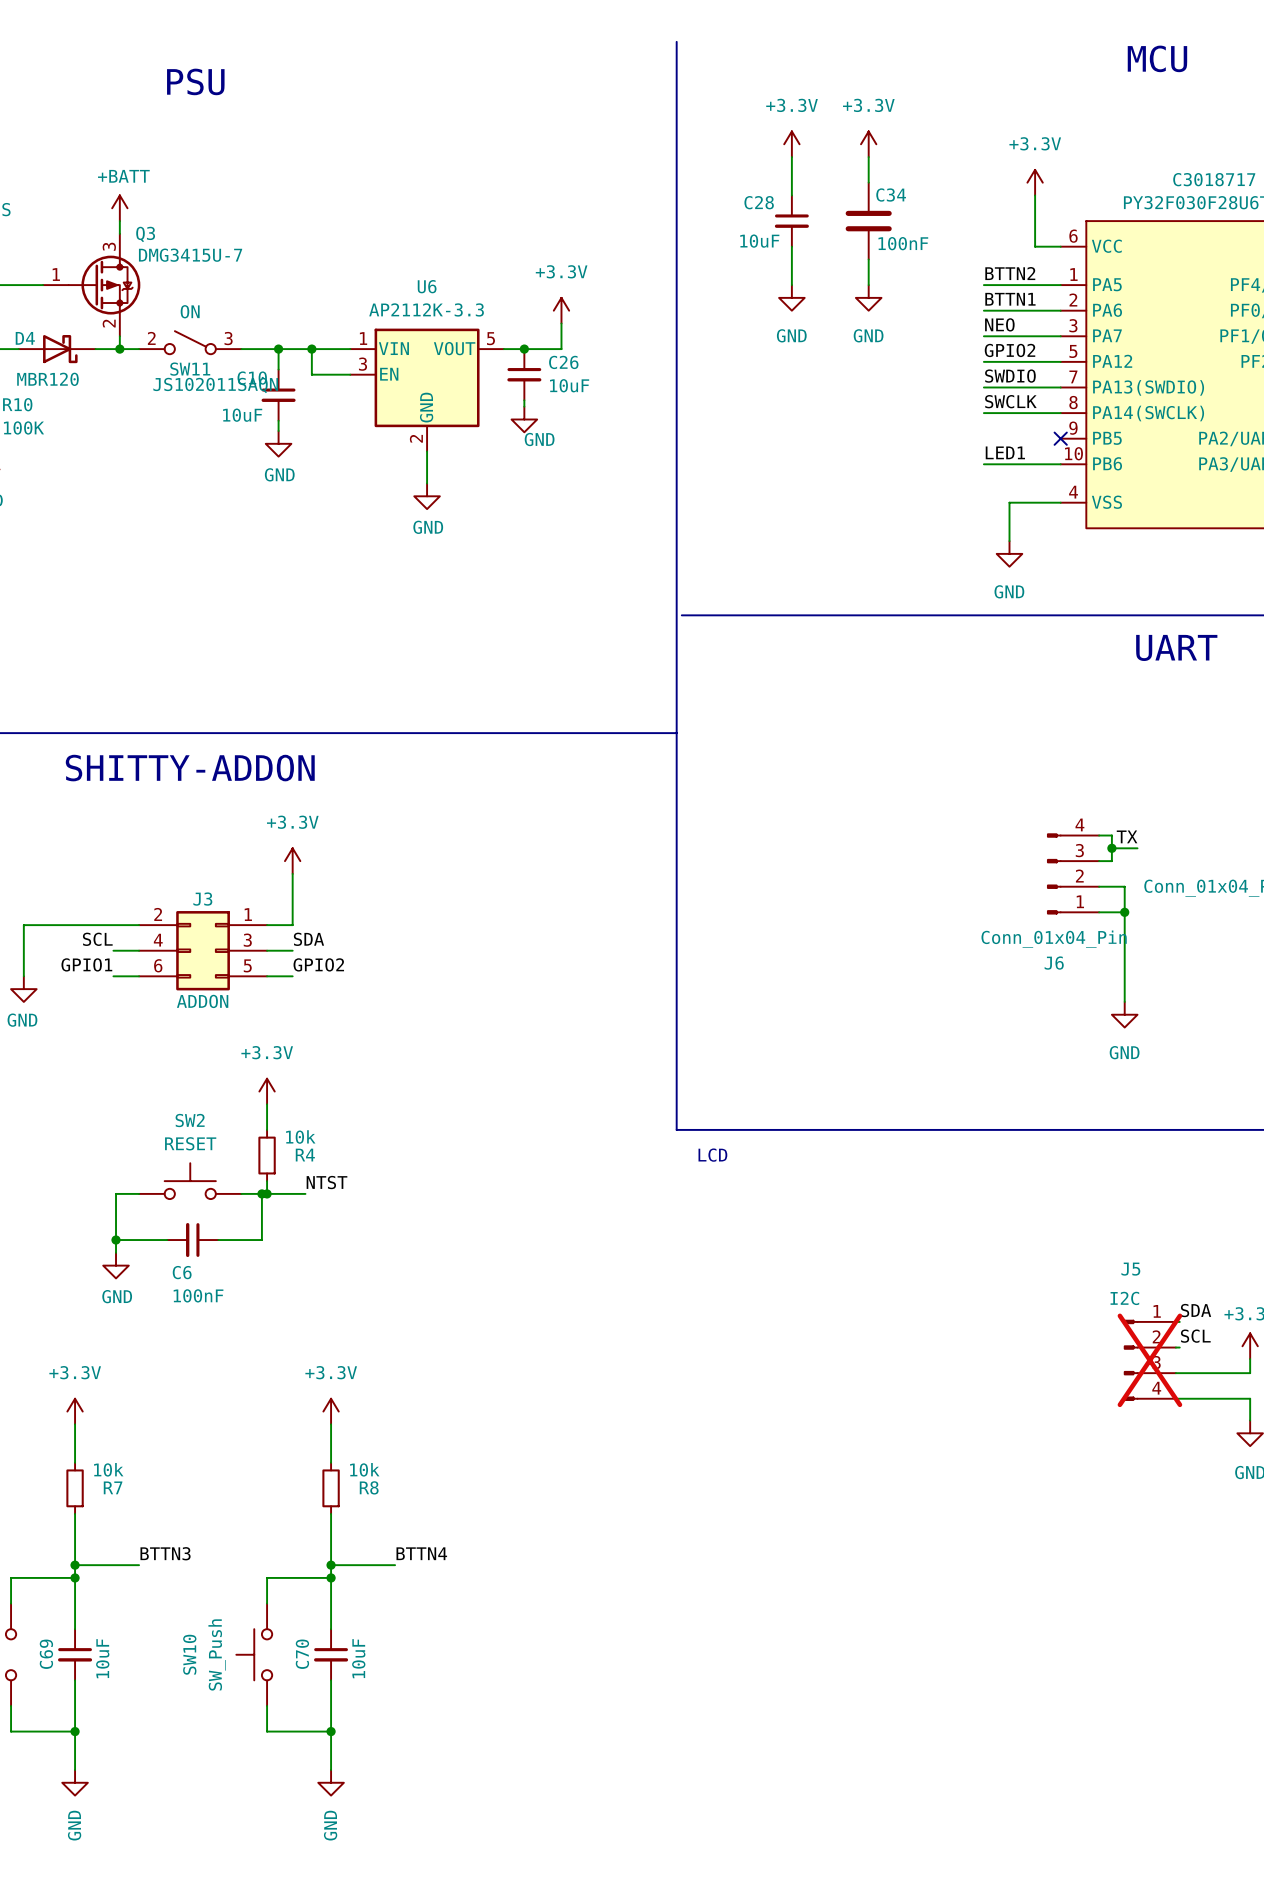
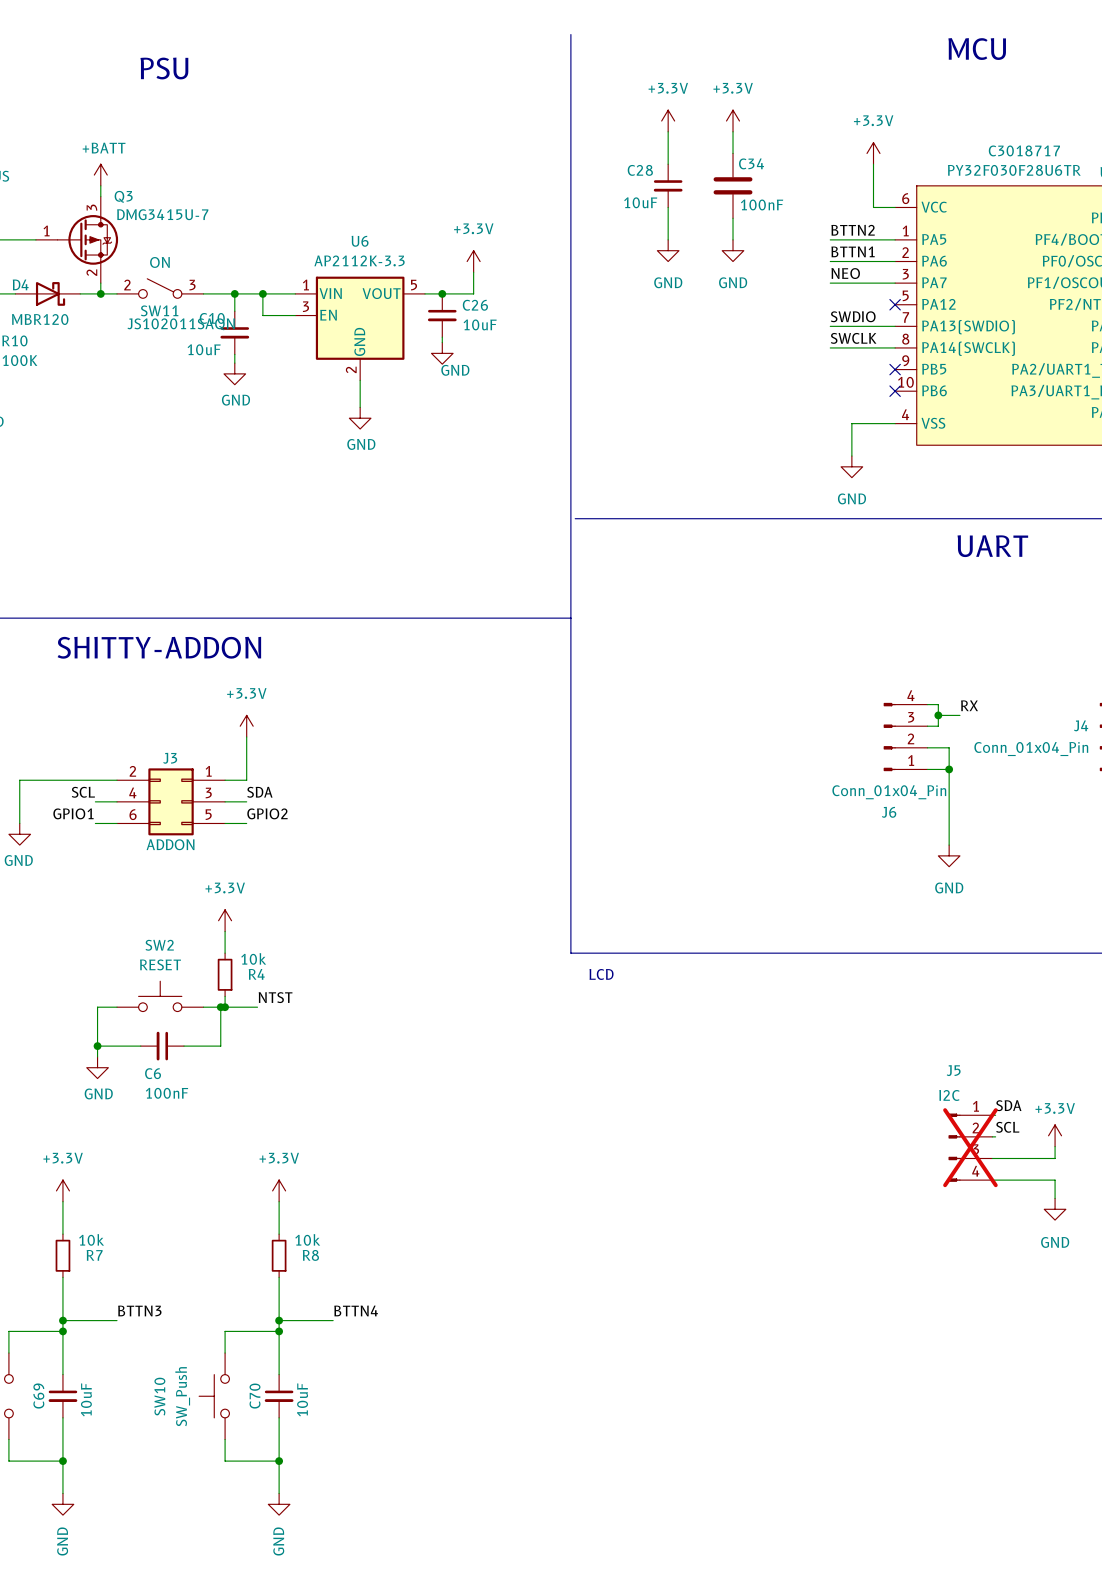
label: GPIO2 (1010, 350) -> none
wire: (983, 361) (1060, 361) -> none
no-connect mark: none -> (895, 304)
label: LED1 (1005, 452) -> none
wire: (983, 464) (1060, 464) -> none
no-connect mark: none -> (895, 391)
label: TX (1127, 836) -> RX (969, 705)

